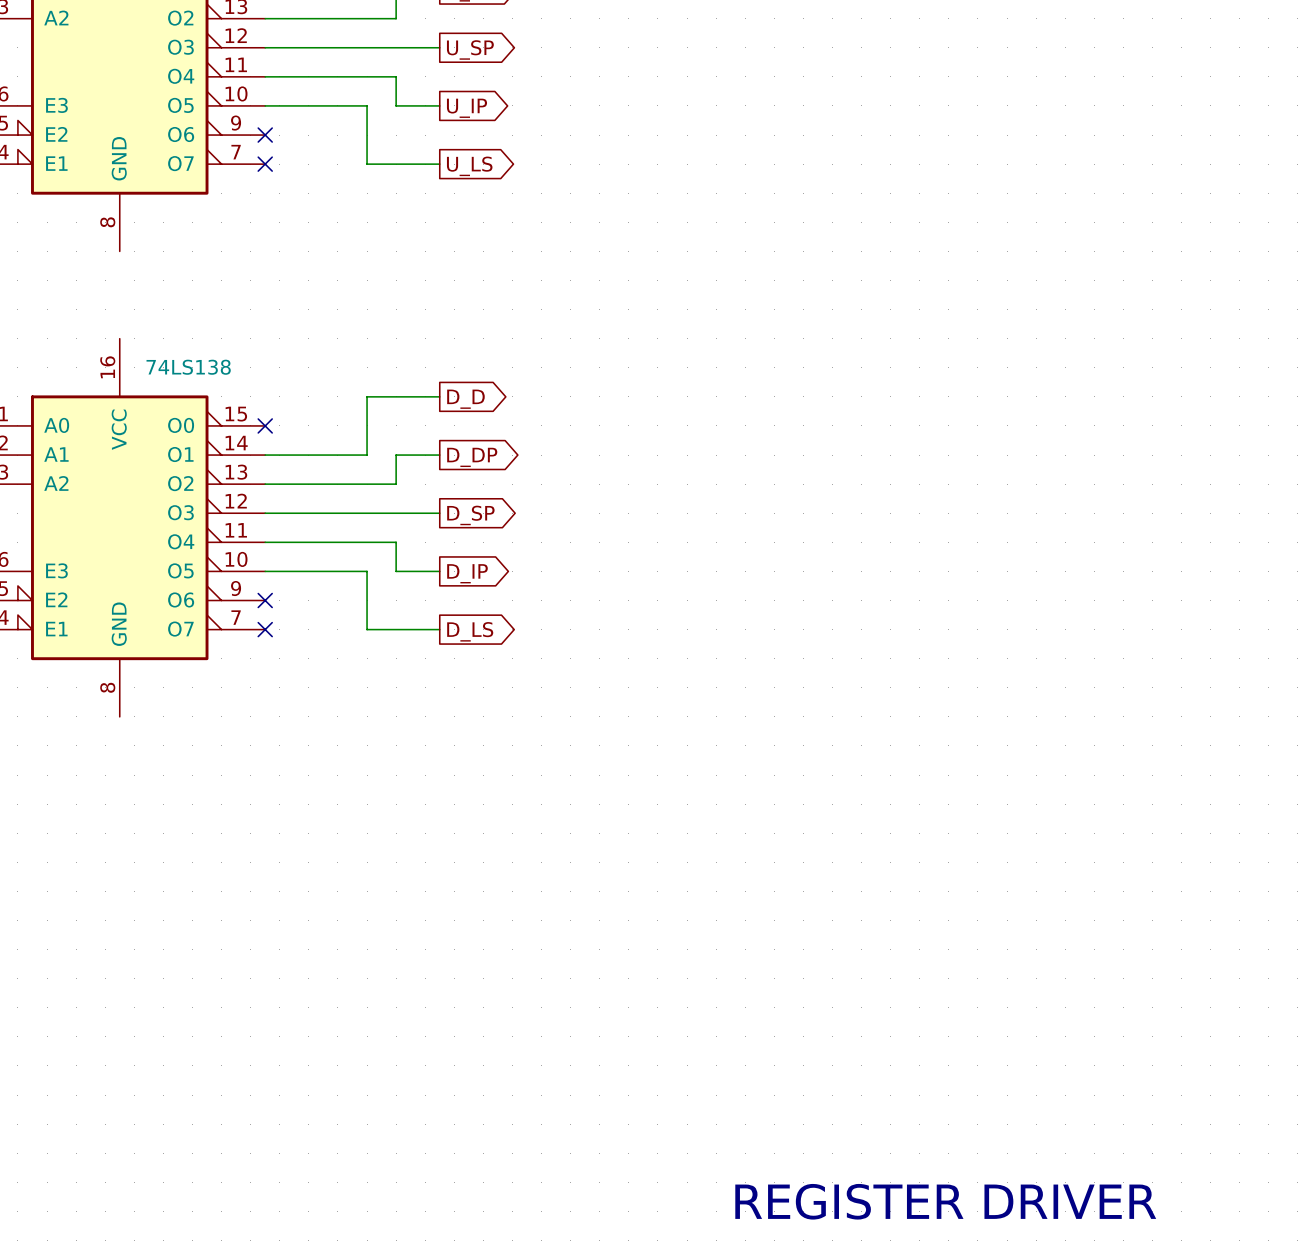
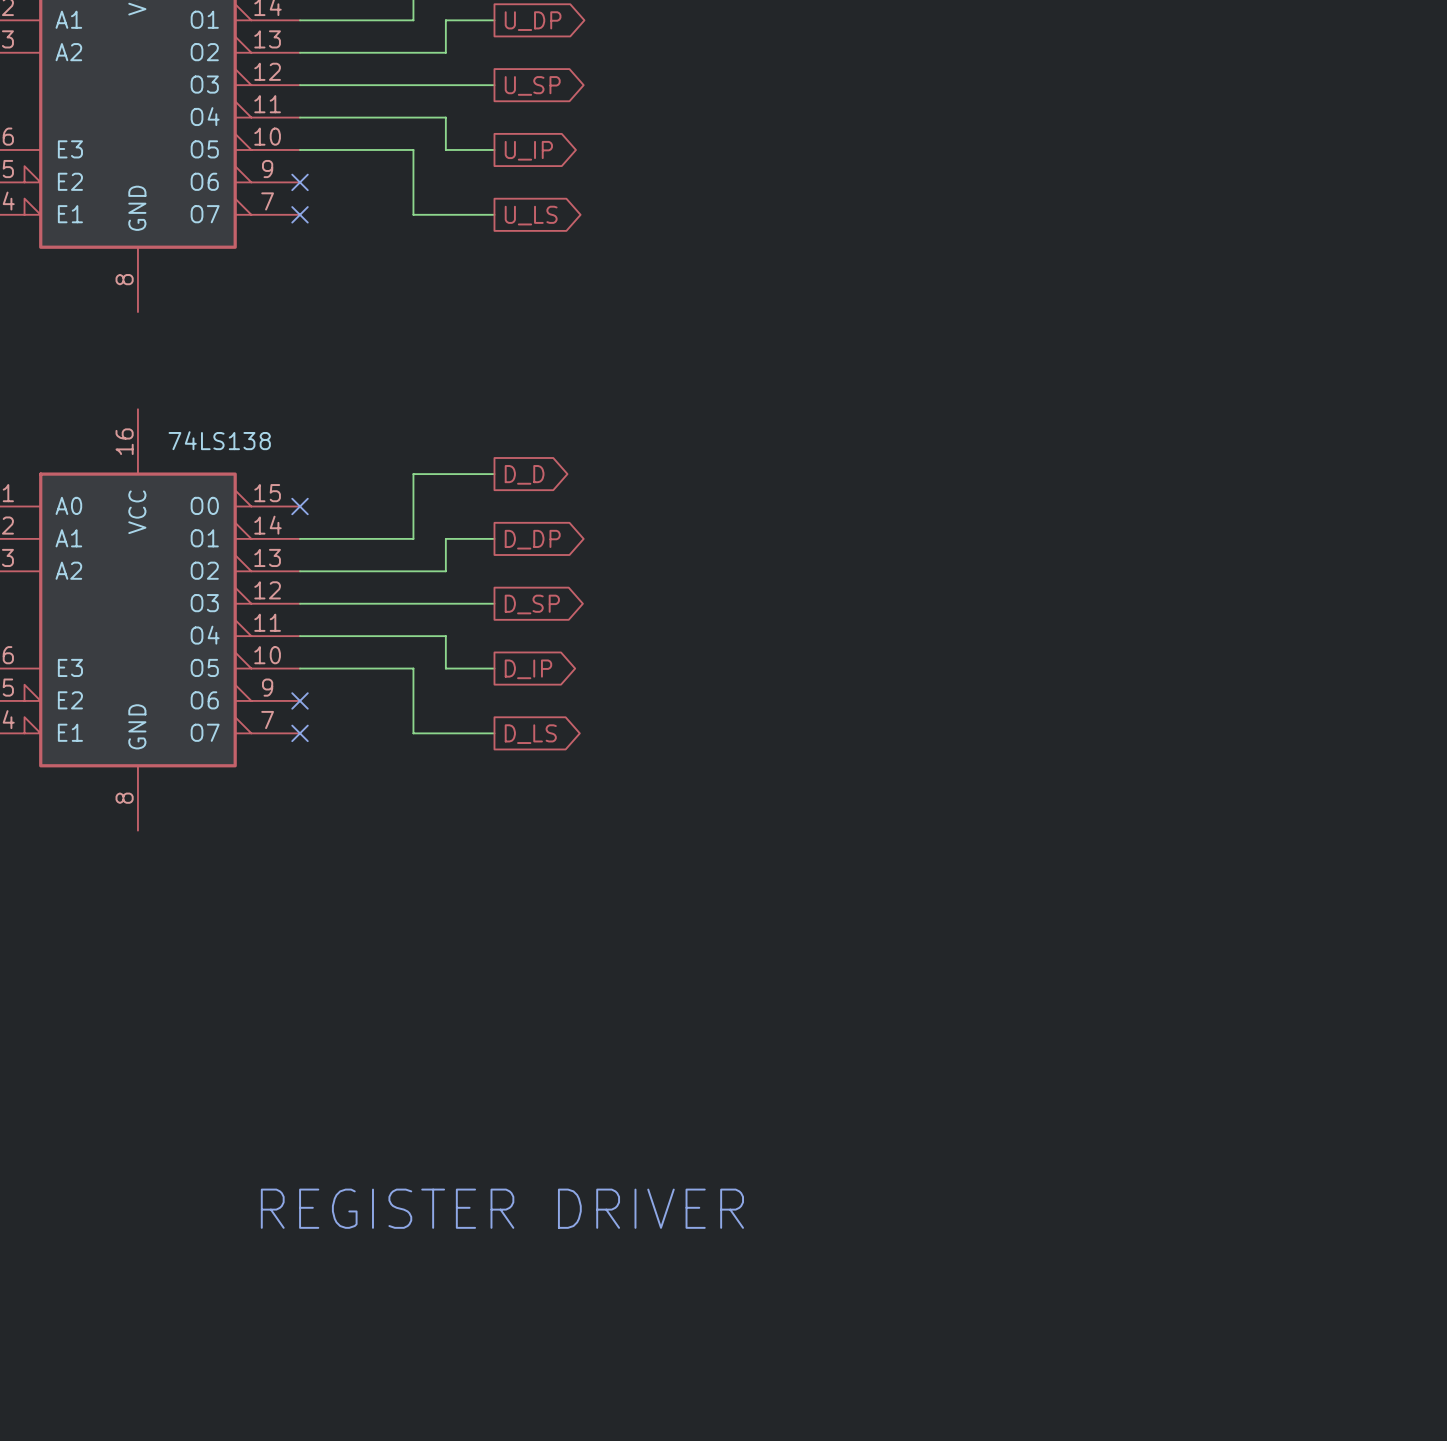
text: none -> REGISTER DRIVER (502, 1208)
text: REGISTER DRIVER (945, 1201) -> none

